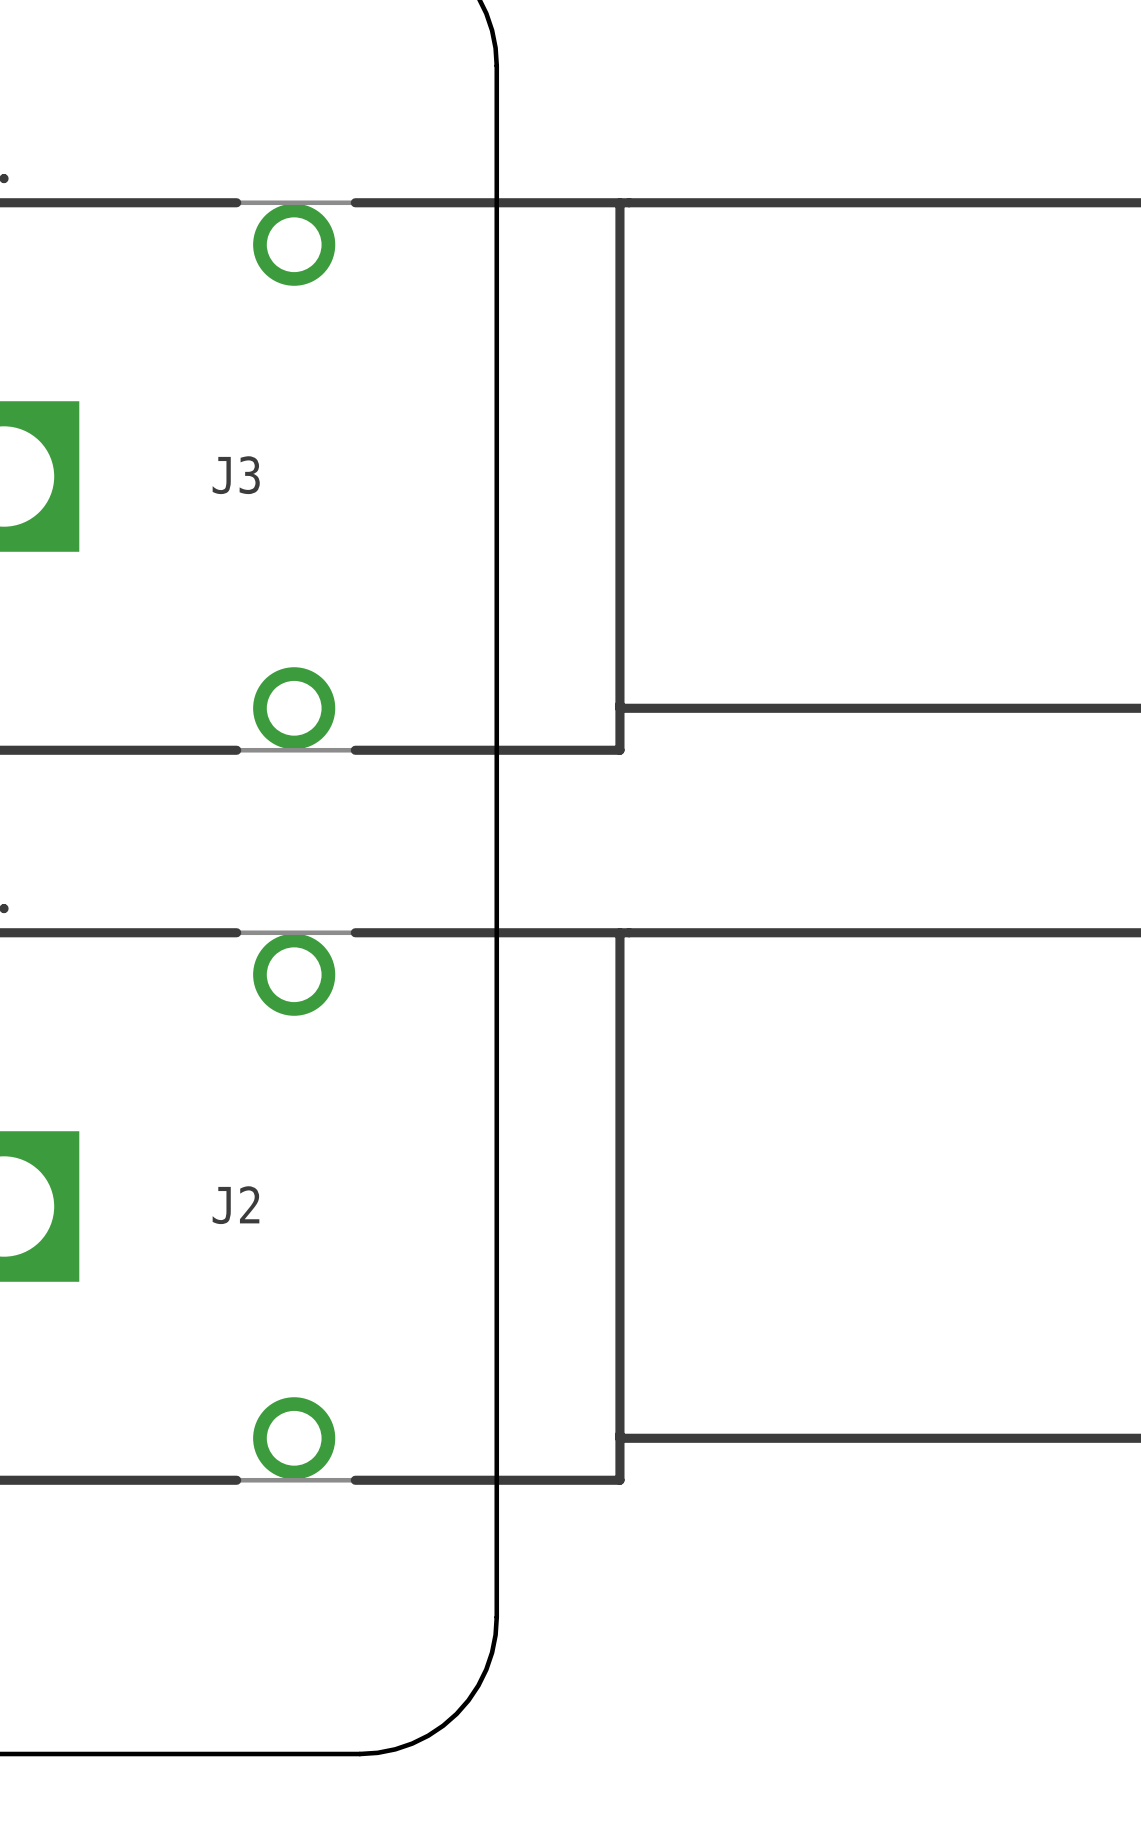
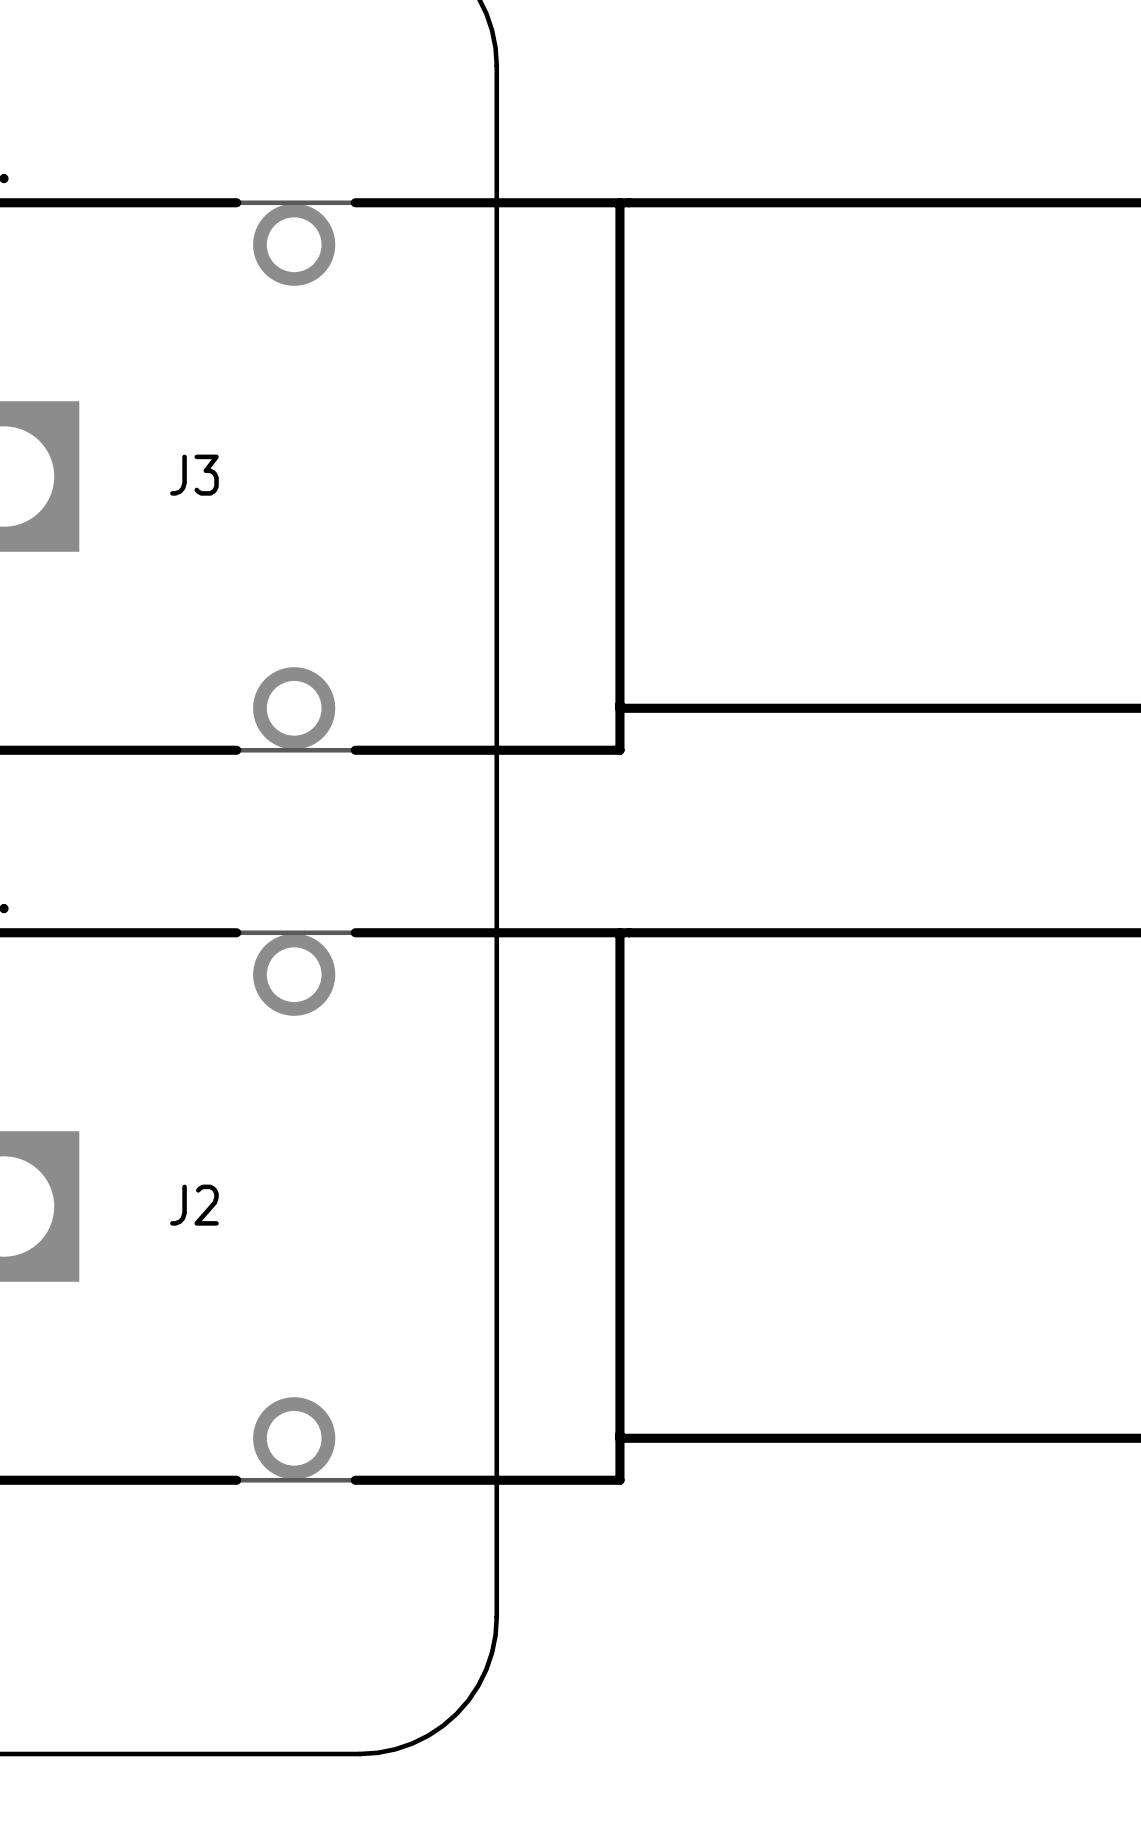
J3 name position: J3 (236, 475) -> J3 (194, 475)
J2 name position: J2 (236, 1205) -> J2 (194, 1205)

